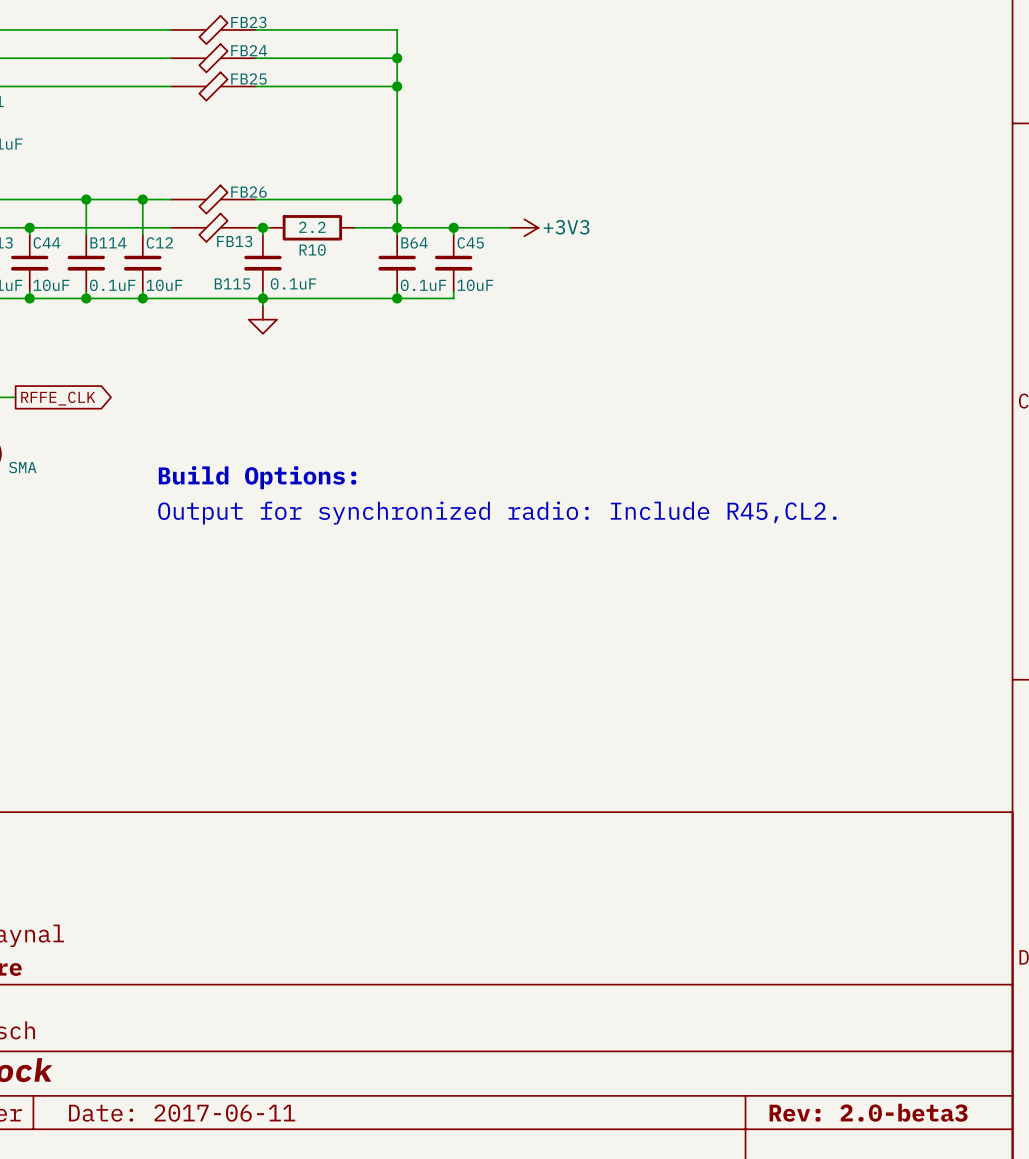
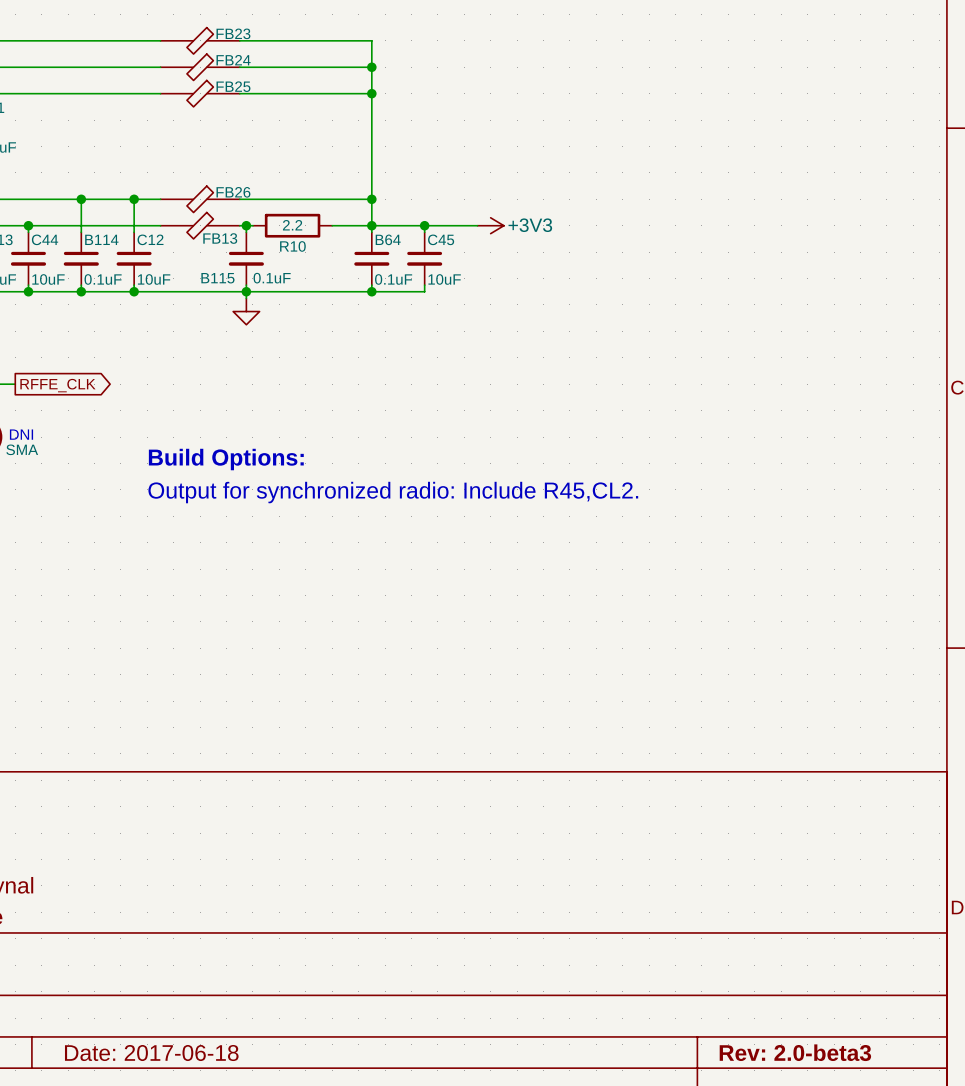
text: none -> DNI (21, 434)
title block: Date: 2017-06-11 (182, 1113) -> Date: 2017-06-18 (151, 1053)

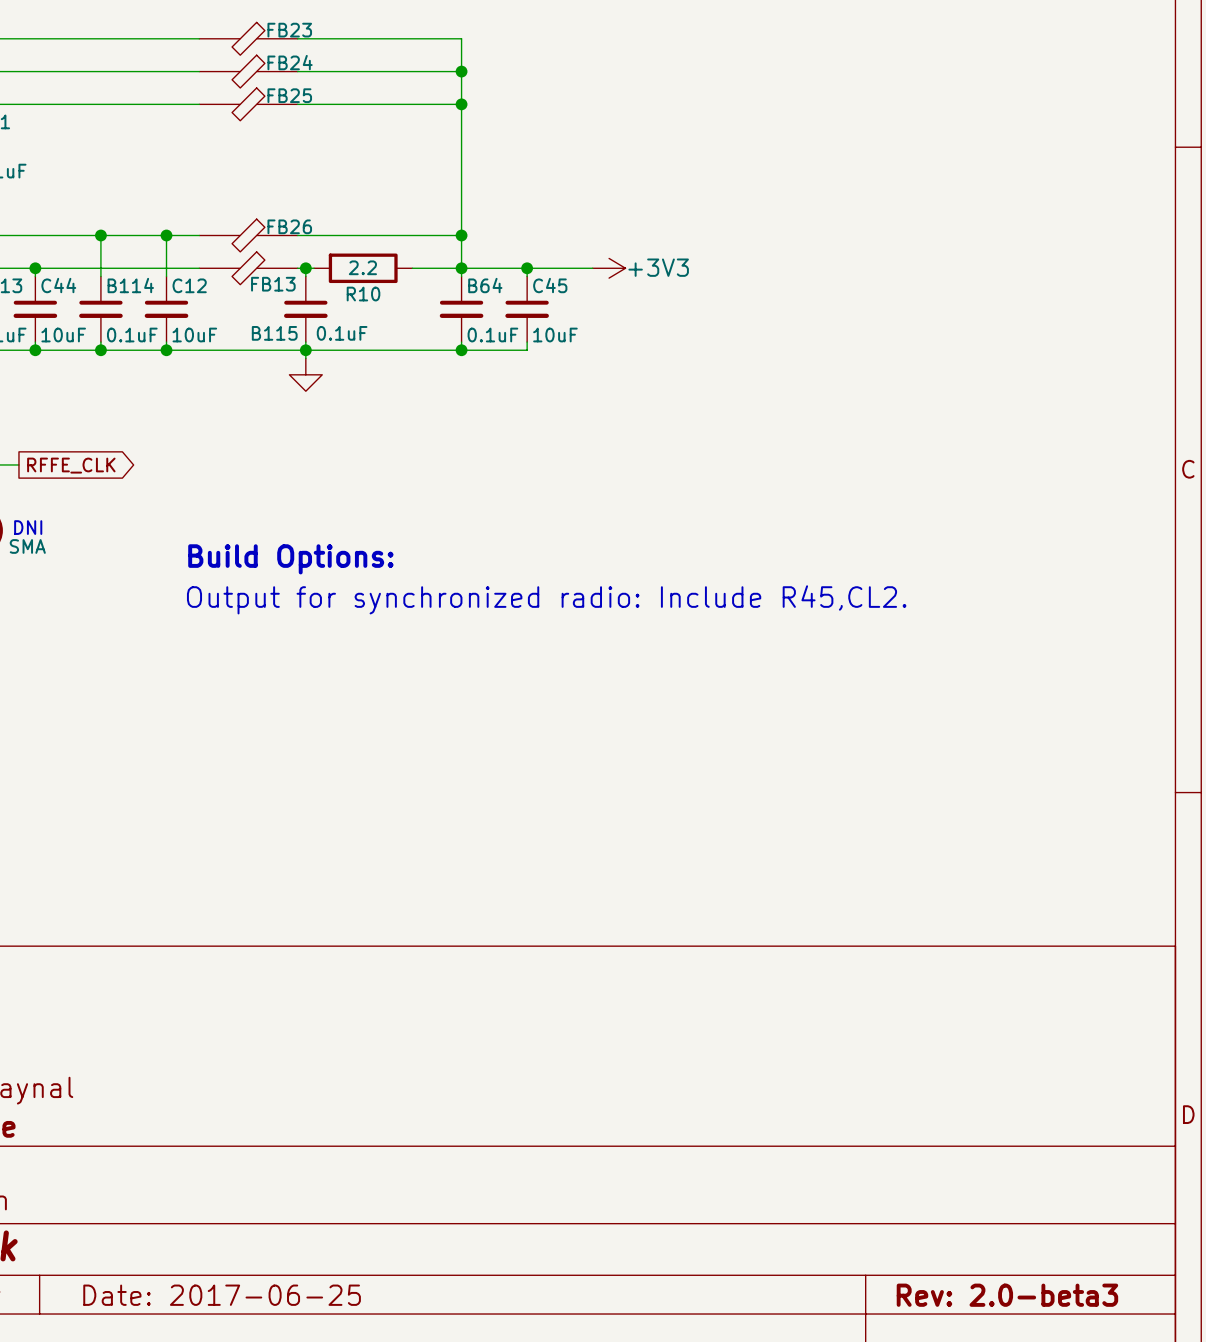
title block: Date: 2017-06-18 (151, 1053) -> Date: 2017-06-25 (222, 1295)

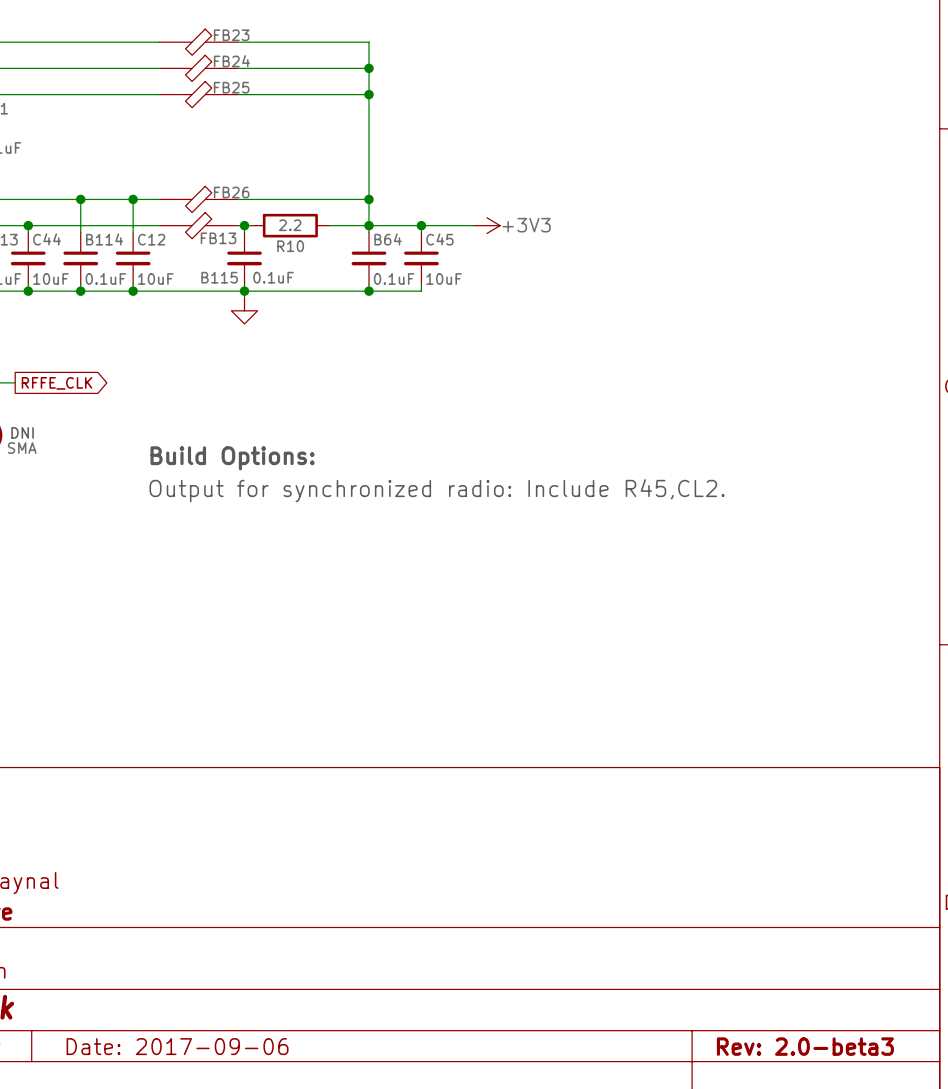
title block: Date: 2017-06-25 (222, 1295) -> Date: 2017-09-06 (177, 1046)

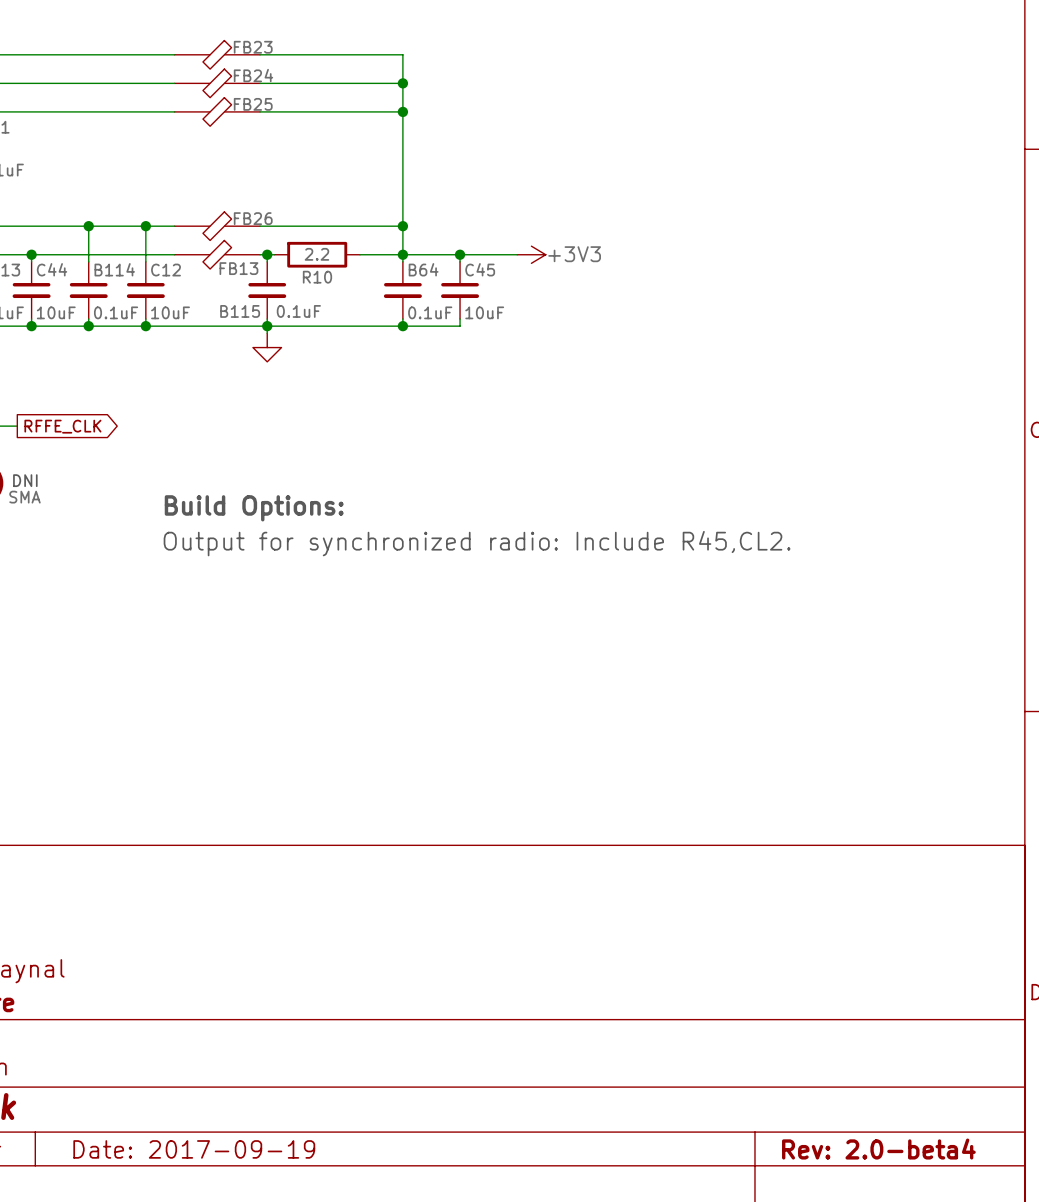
title block: Date: 2017-09-06 (177, 1046) -> Date: 2017-09-19 (194, 1149)
title block: Rev: 2.0-beta3 (805, 1046) -> Rev: 2.0-beta4 (878, 1149)

